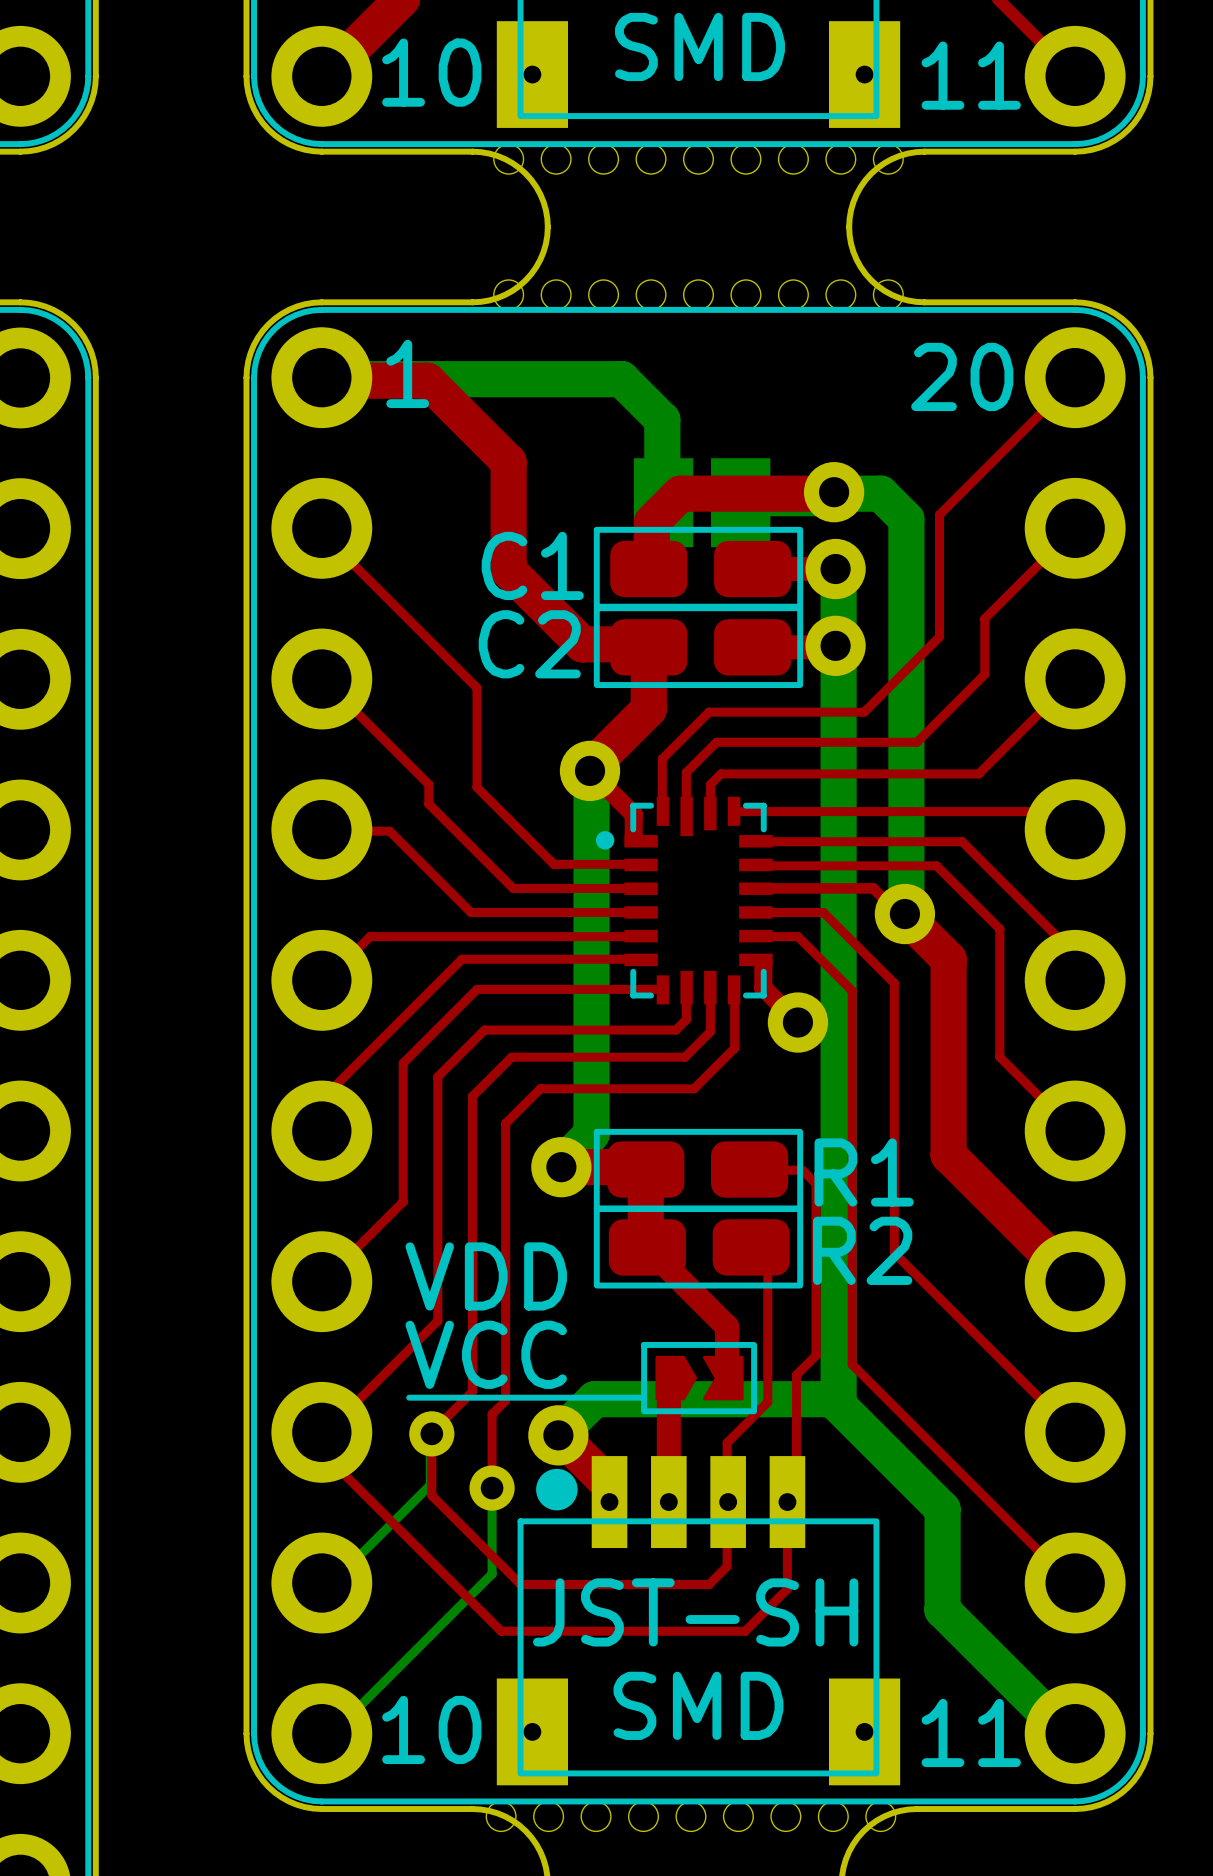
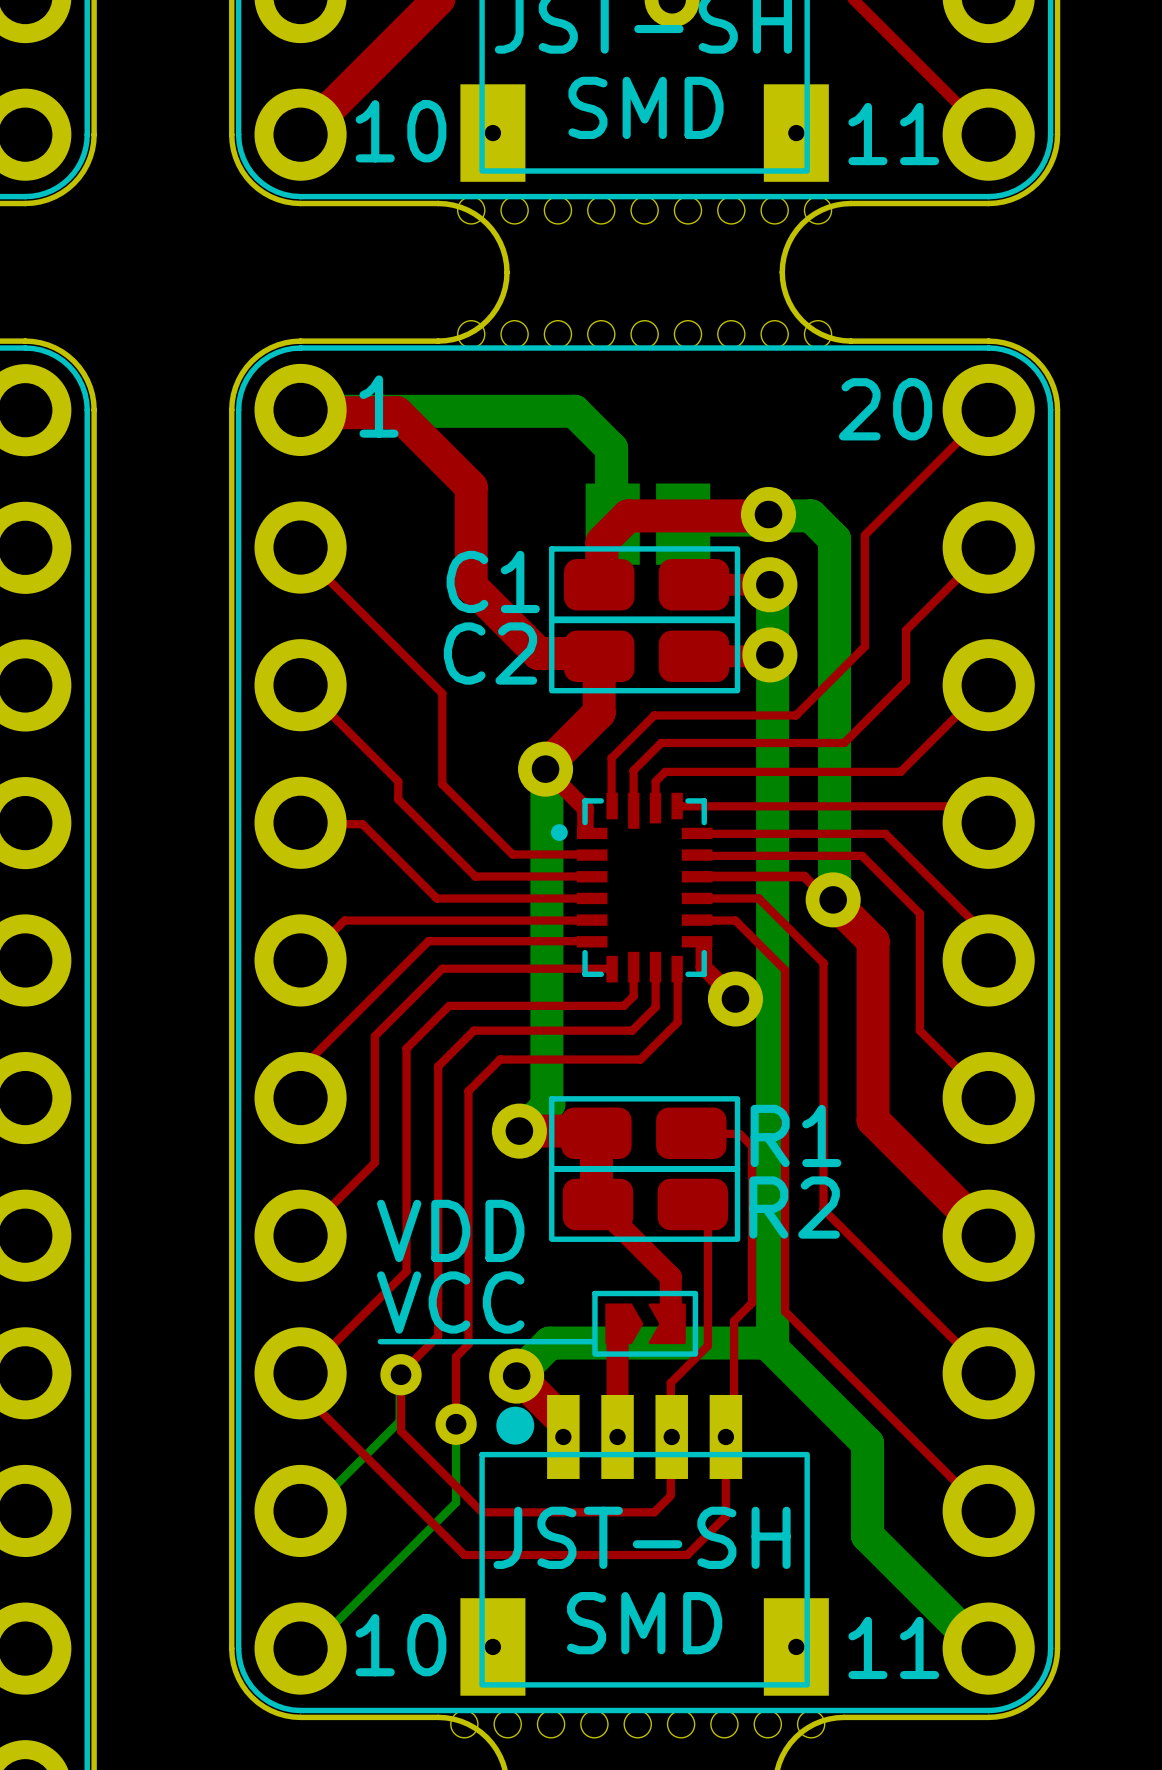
part footprint: [251, 306, 1146, 1805] -> [235, 345, 1054, 1714]

